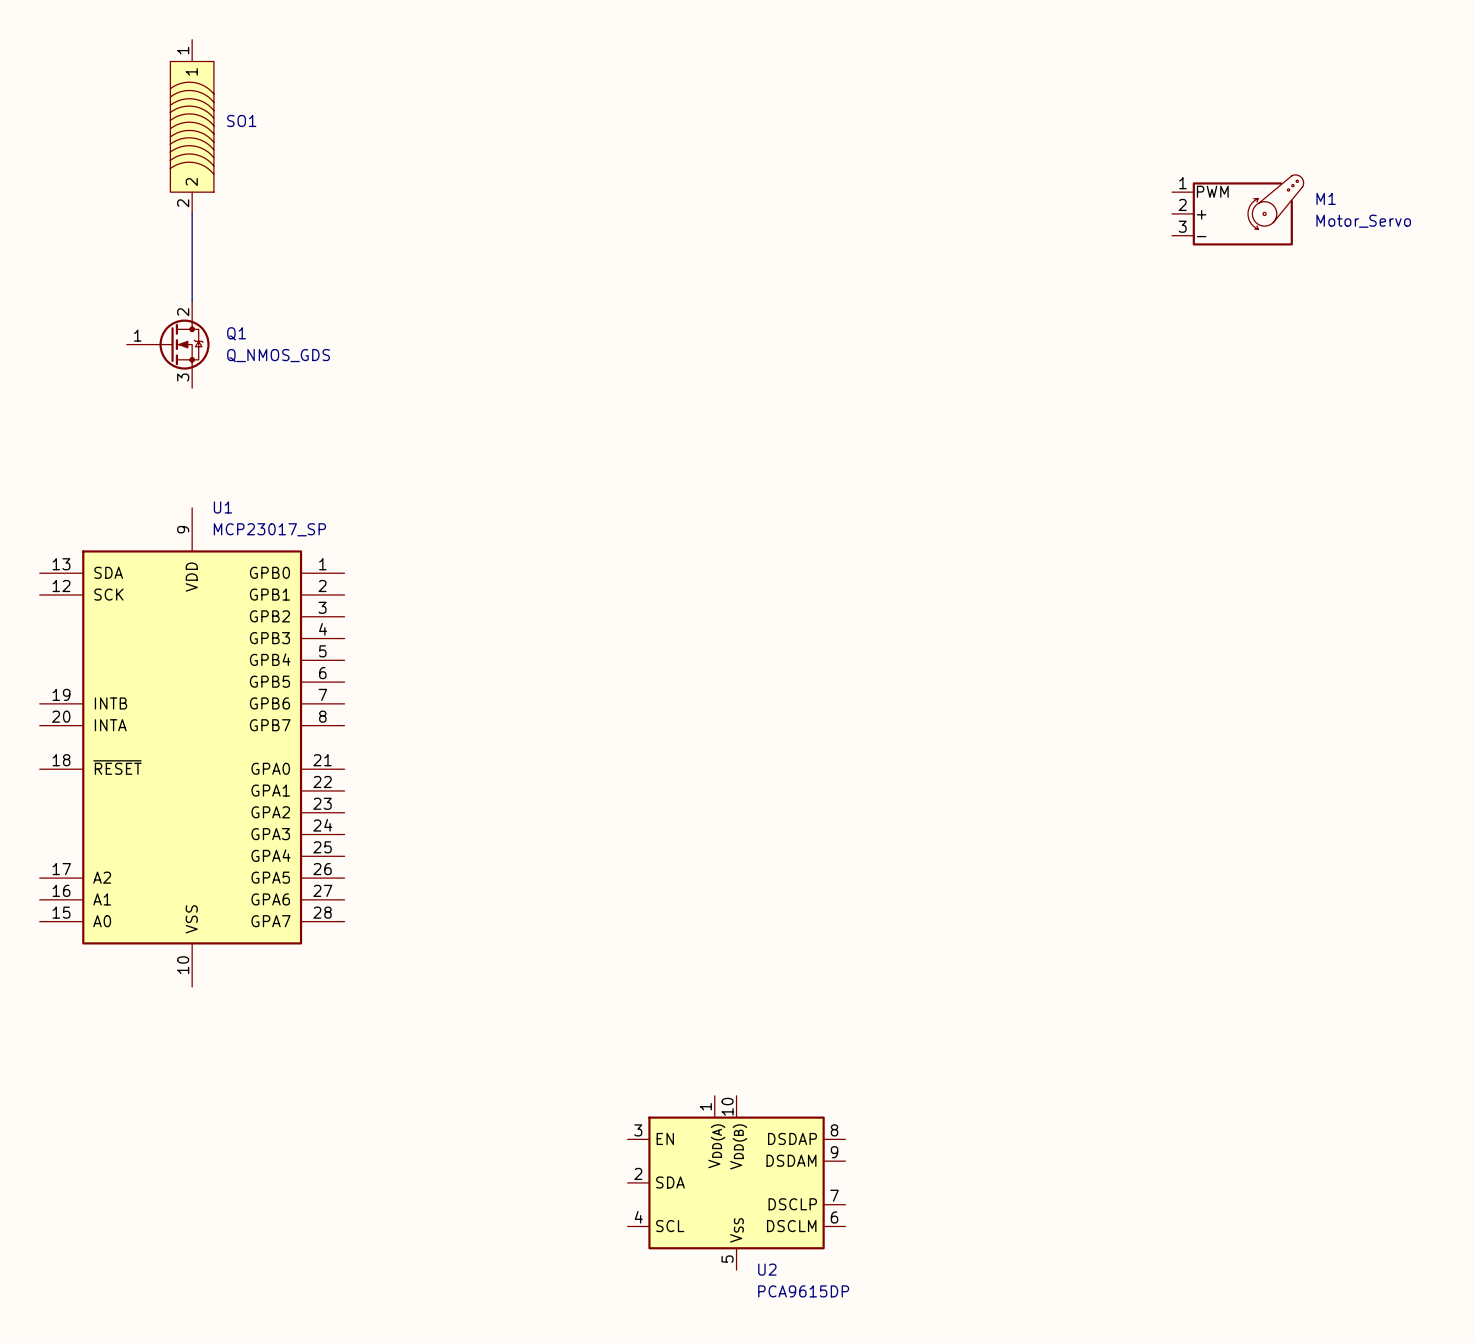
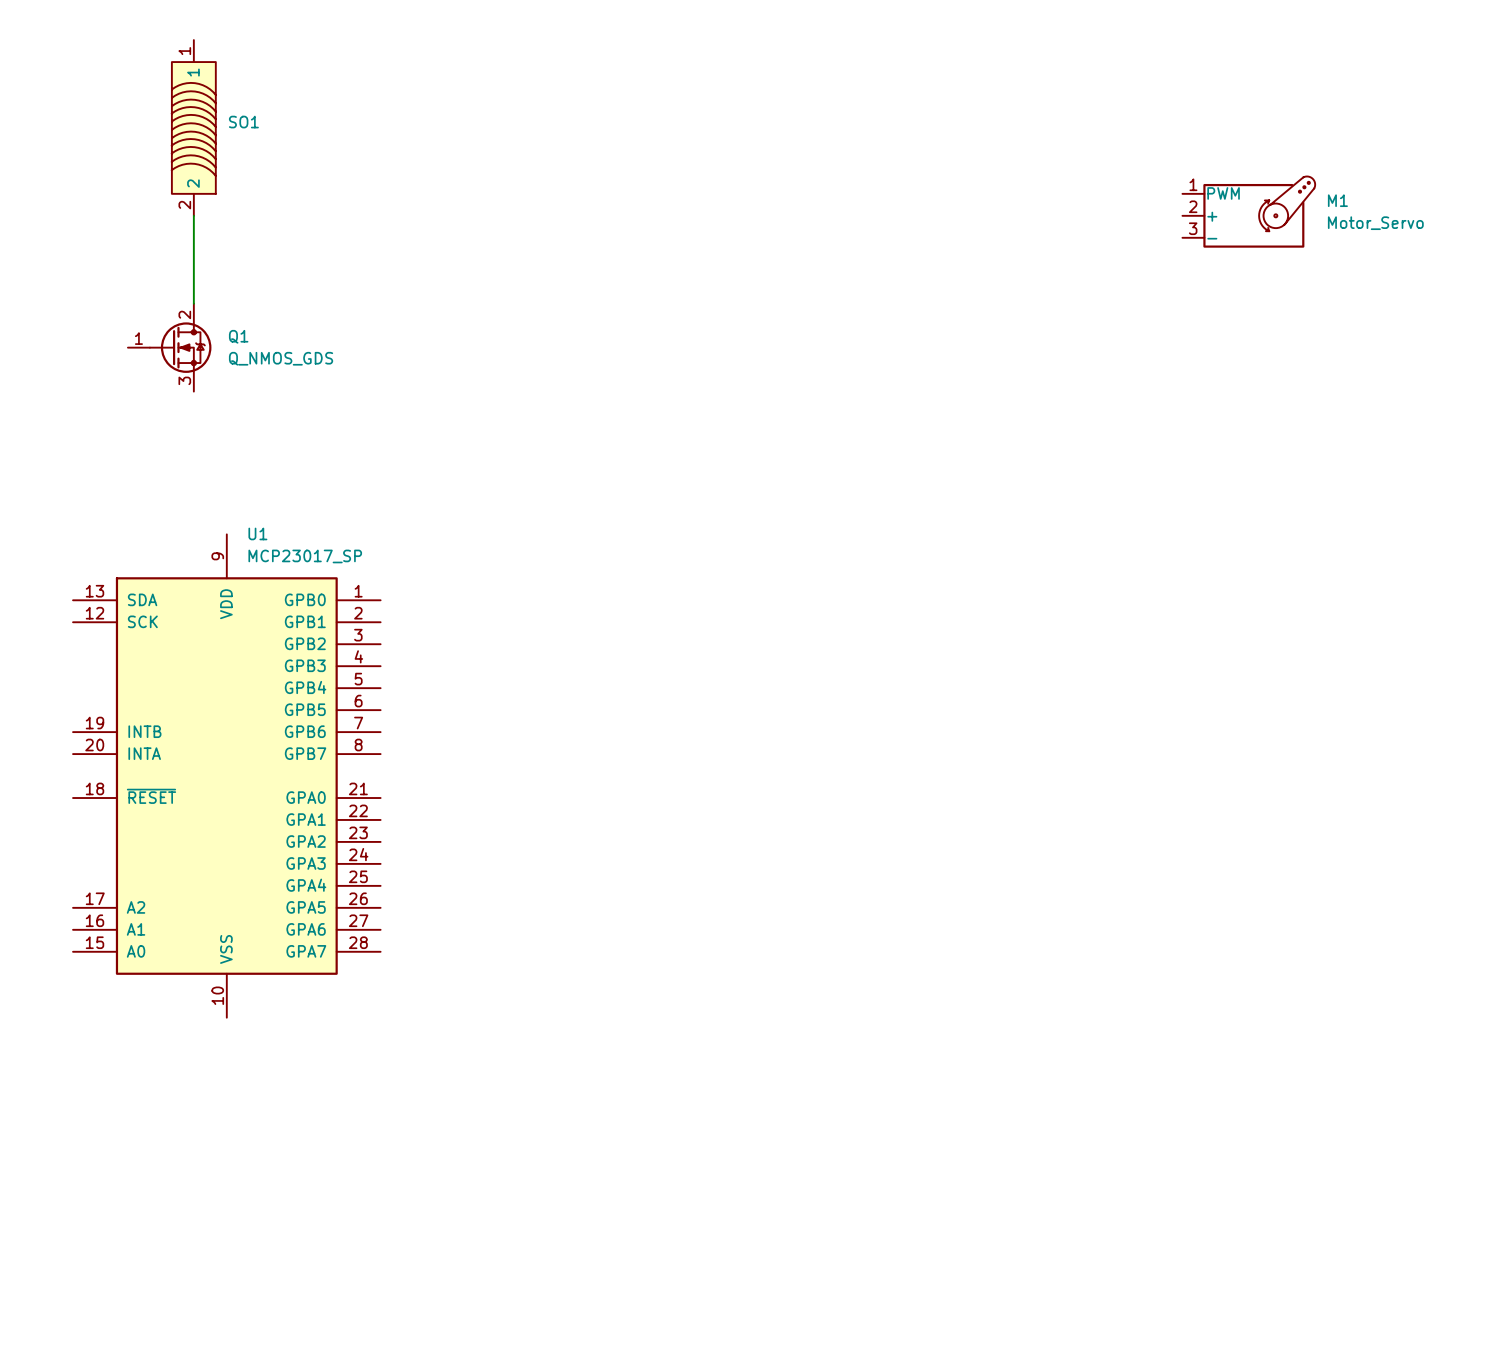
U1 position: (192, 747) -> (226, 776)
U2: PCA9615DP (736, 1182) -> none

